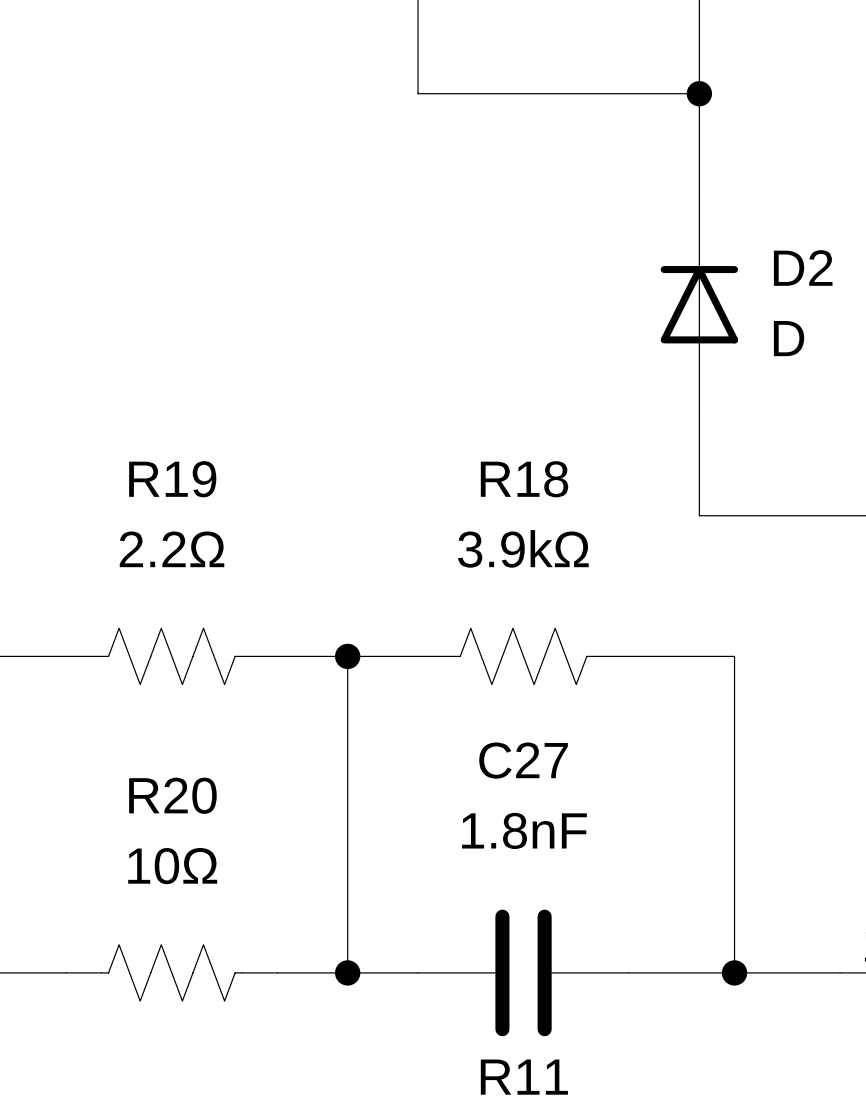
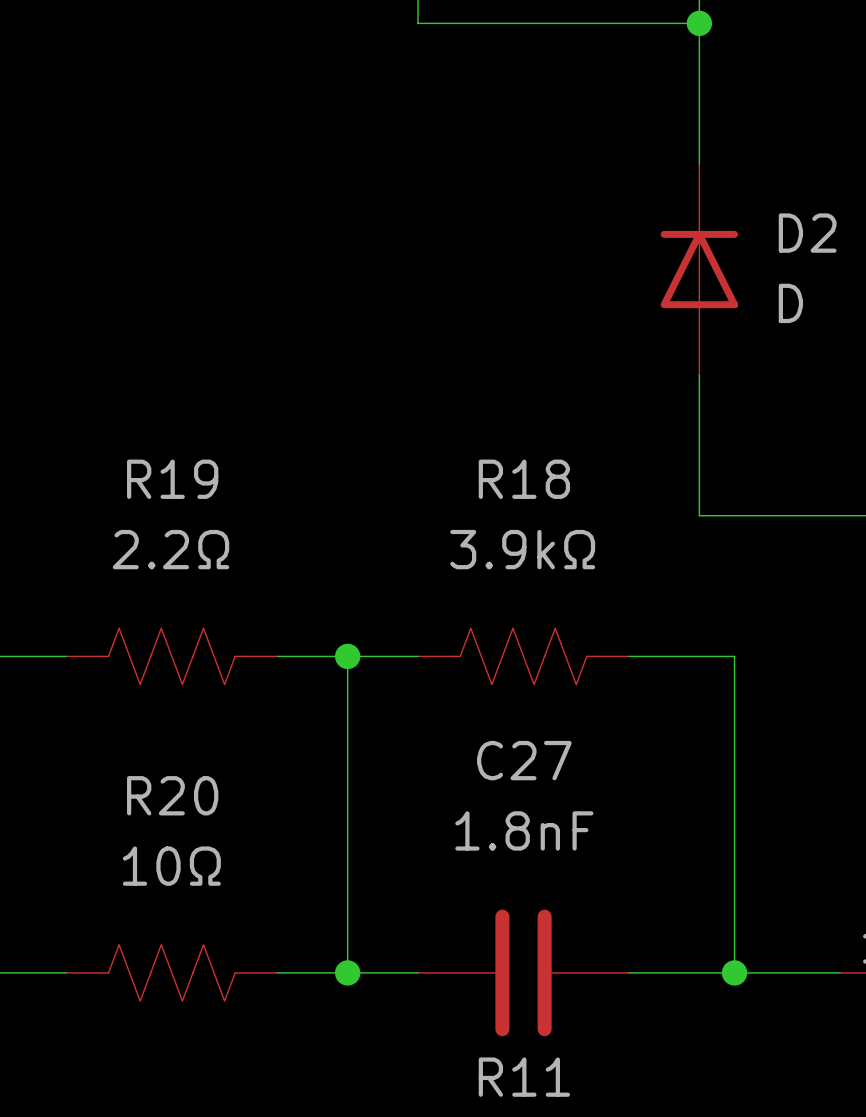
wire: (418, 23) (418, 93) (699, 93) -> (418, 23) (699, 23)
junction position: (699, 93) -> (699, 23)
D2 position: (699, 304) -> (699, 269)

